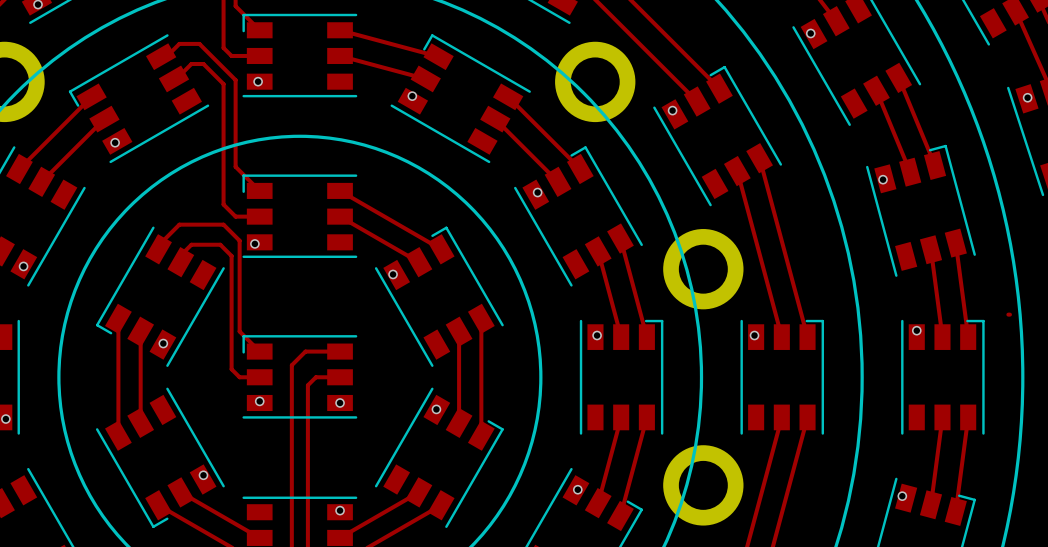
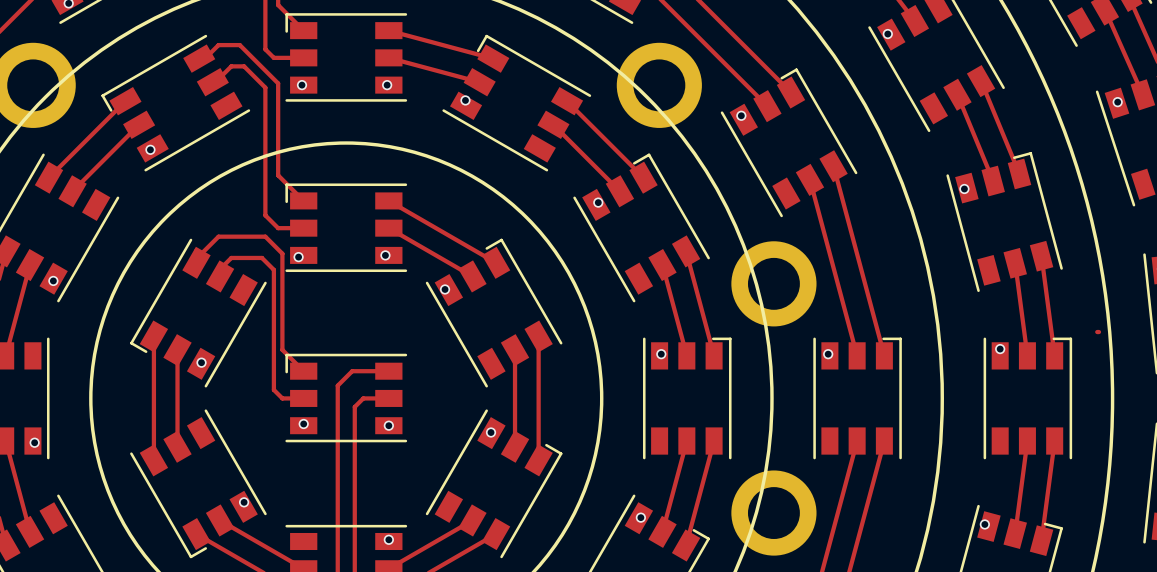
via: none -> (387, 85)
via: none -> (385, 255)

